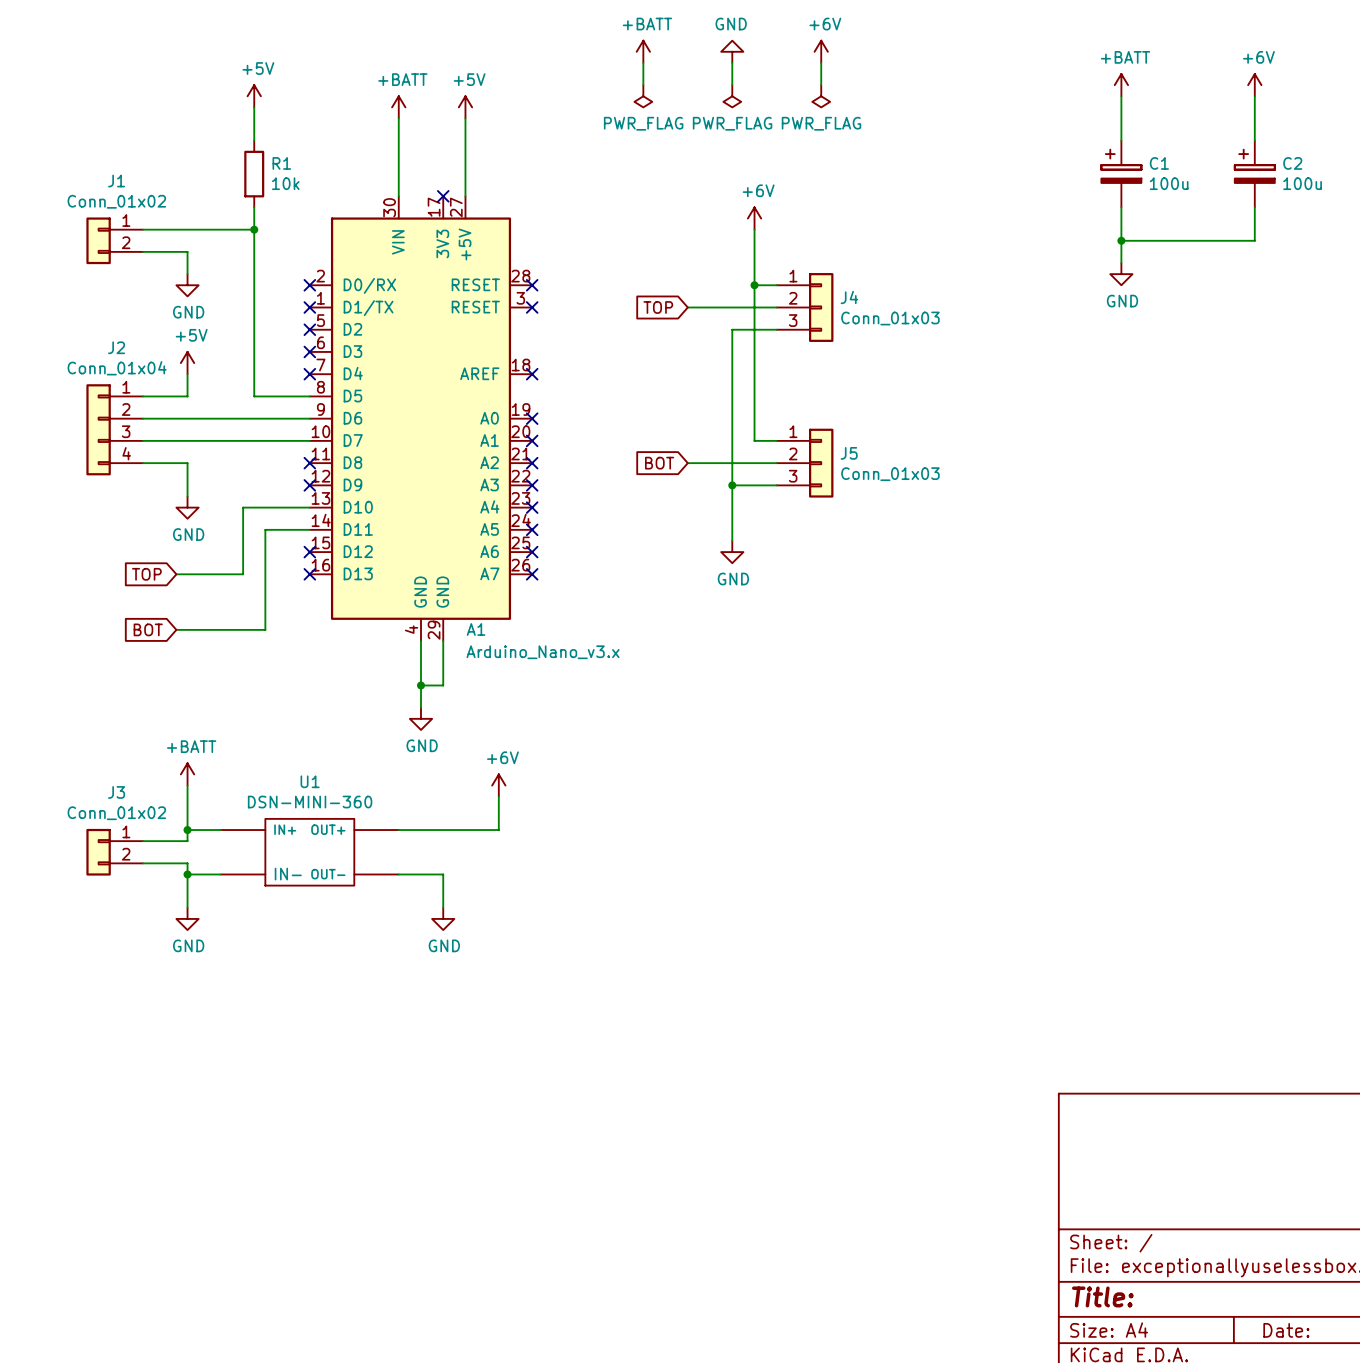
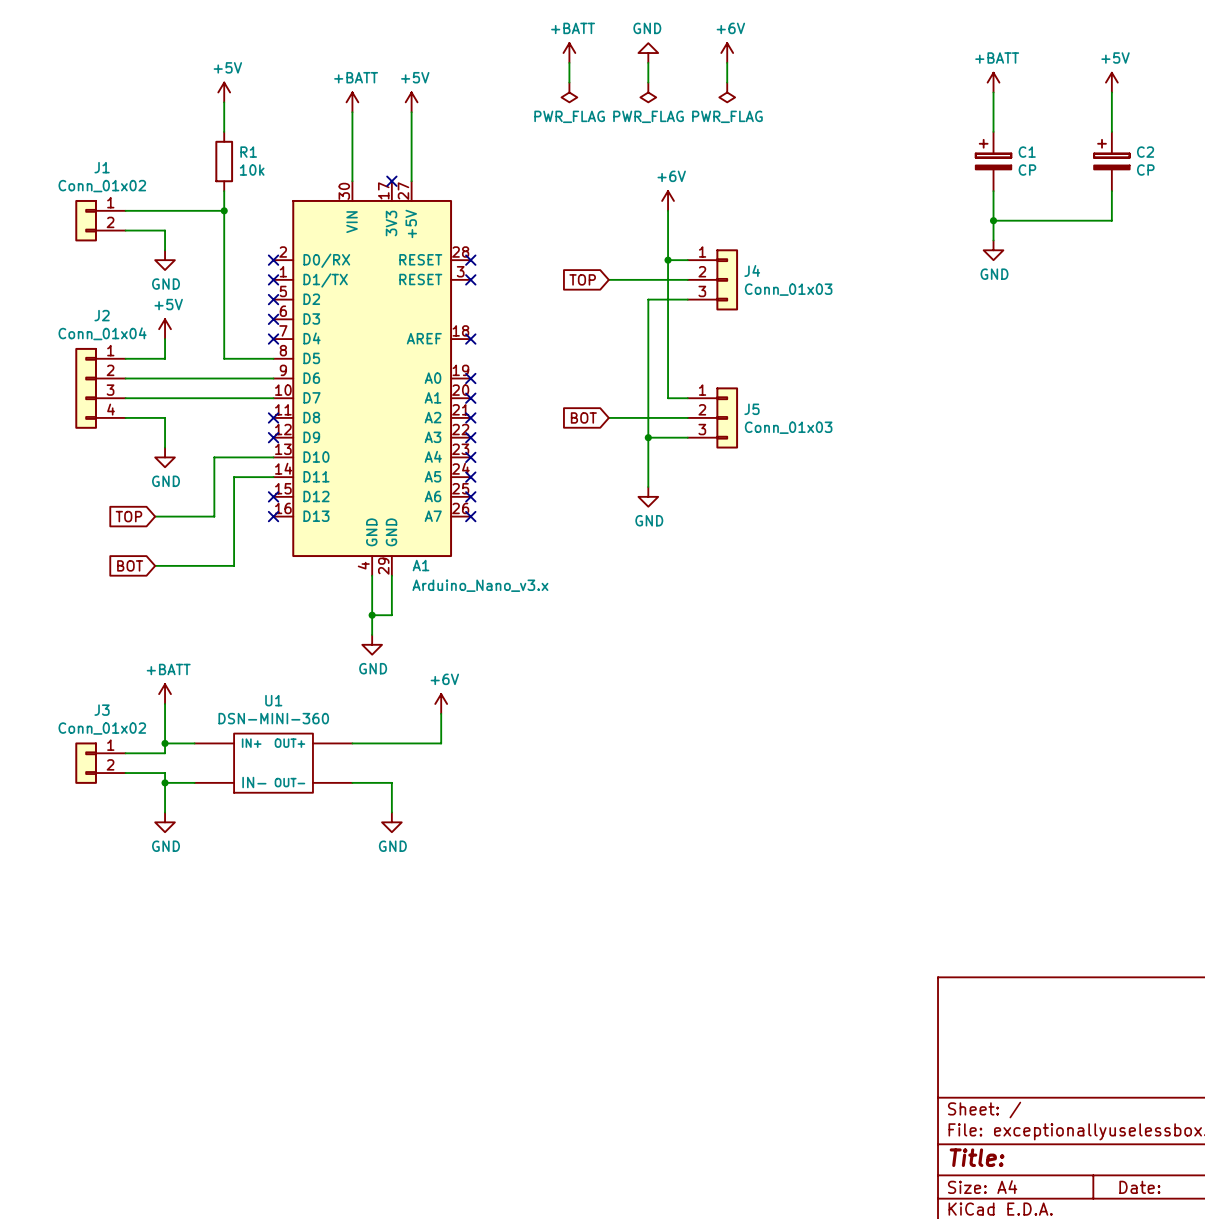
power symbol: +6V (1254, 85) -> +5V (1111, 82)
C1 value: 100u (1169, 183) -> CP (1027, 170)
C2 value: 100u (1302, 183) -> CP (1145, 170)

